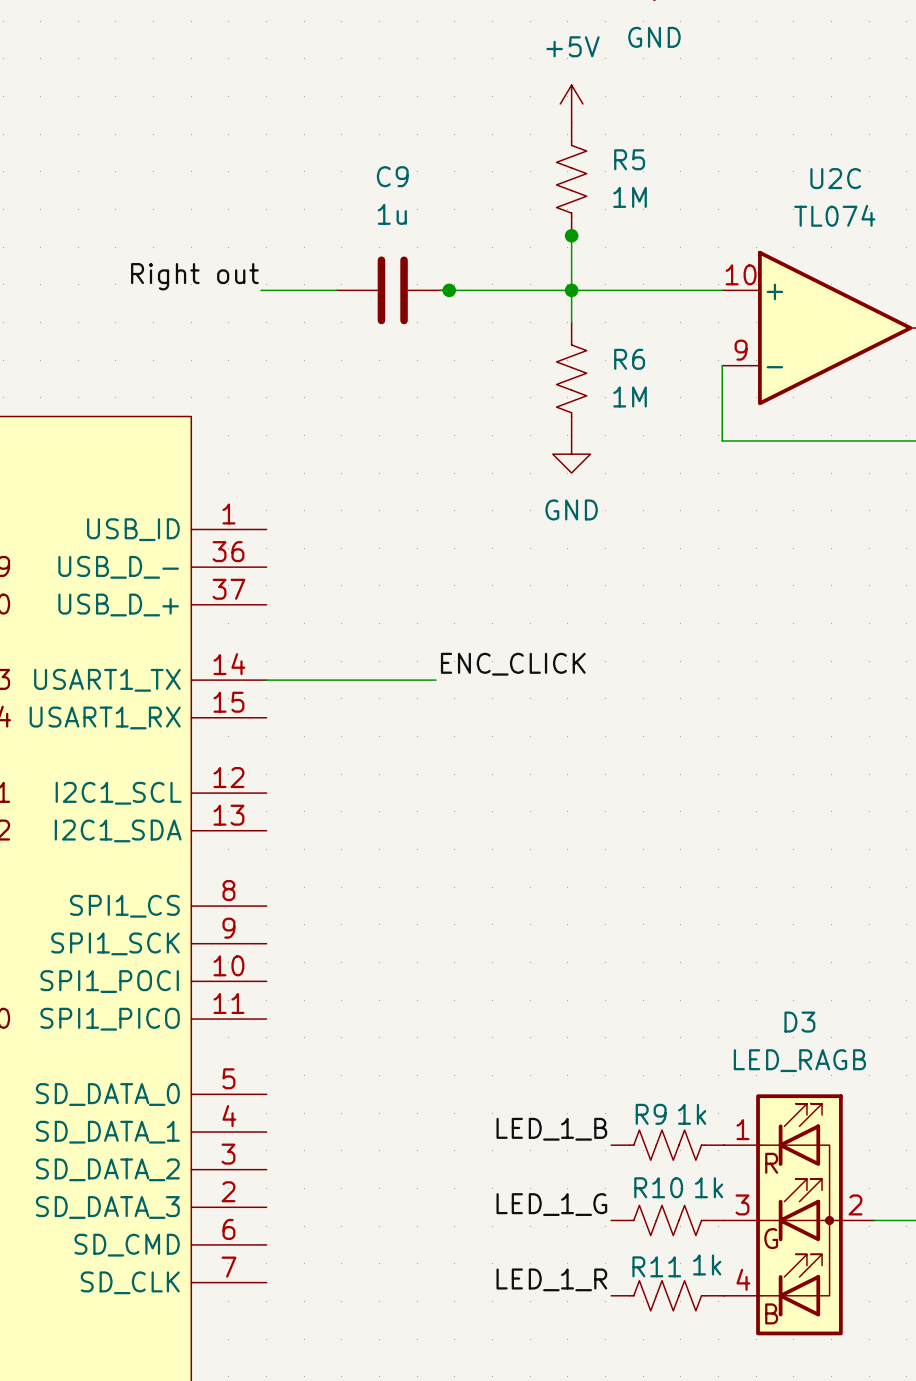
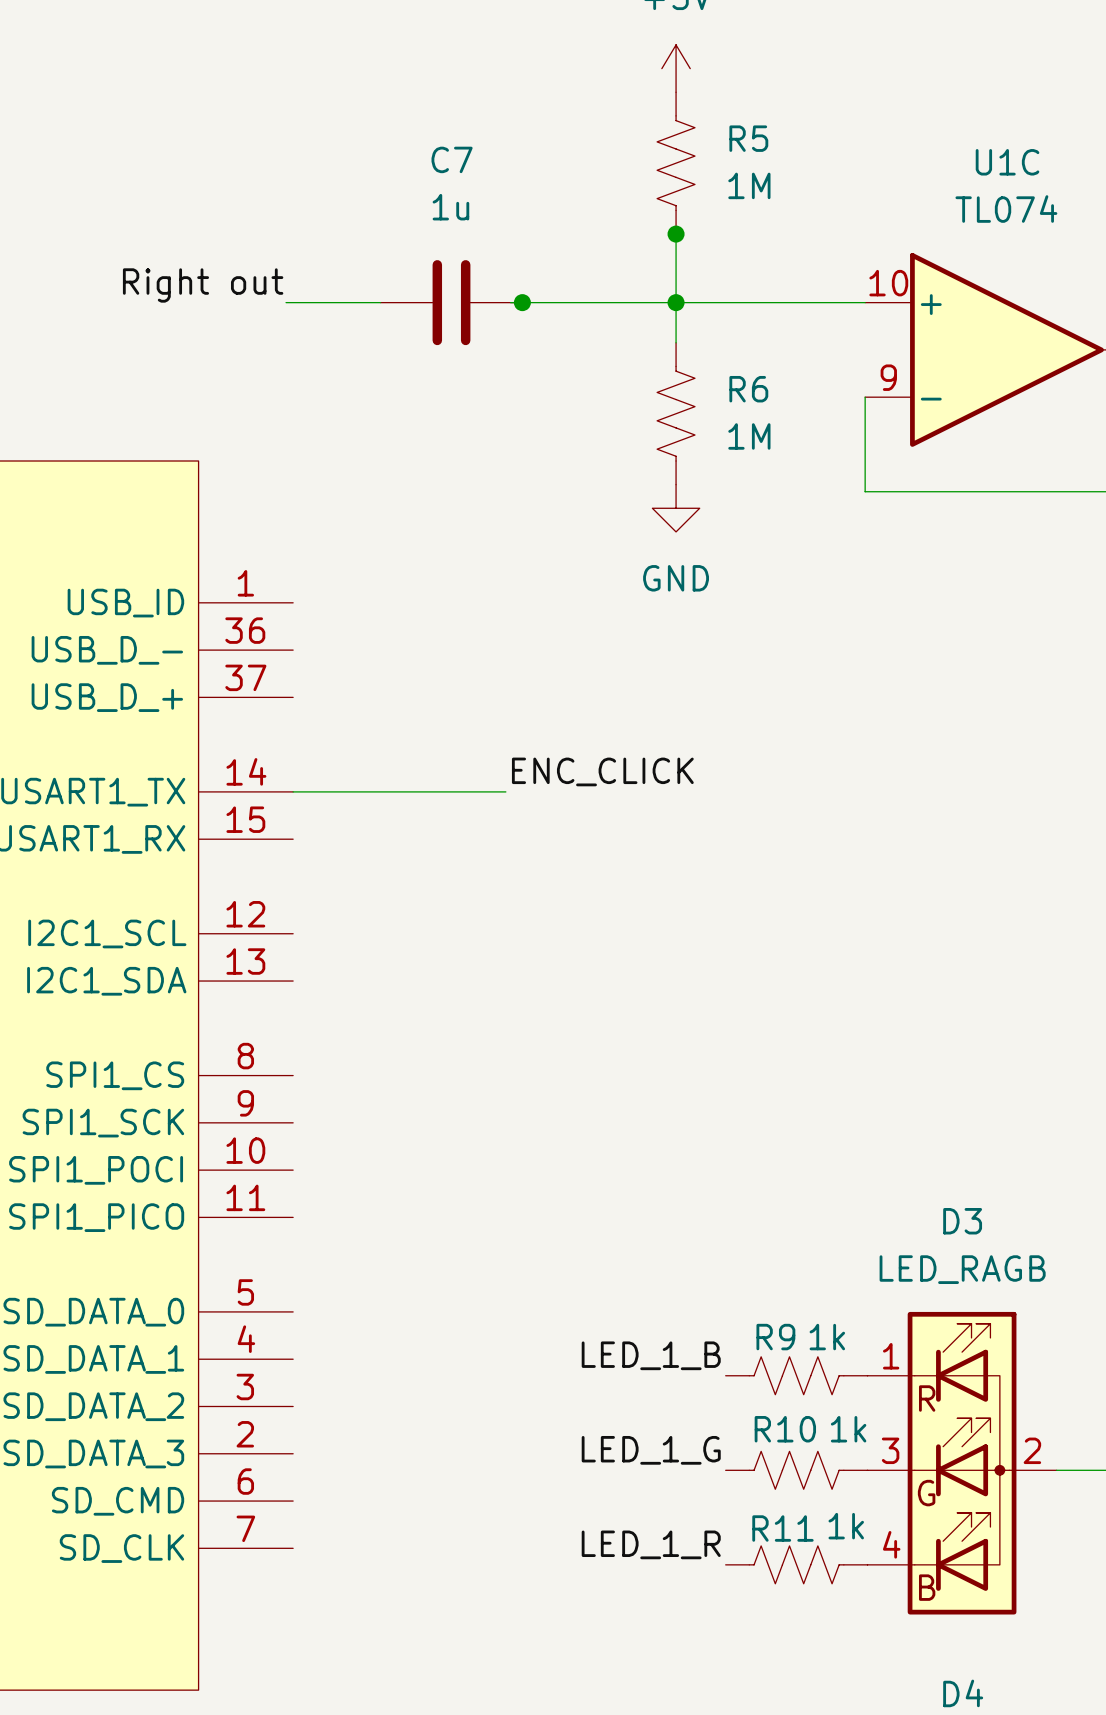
C9 name: C9 (392, 176) -> C7 (452, 159)
U2C name: U2C (835, 178) -> U1C (1007, 162)

